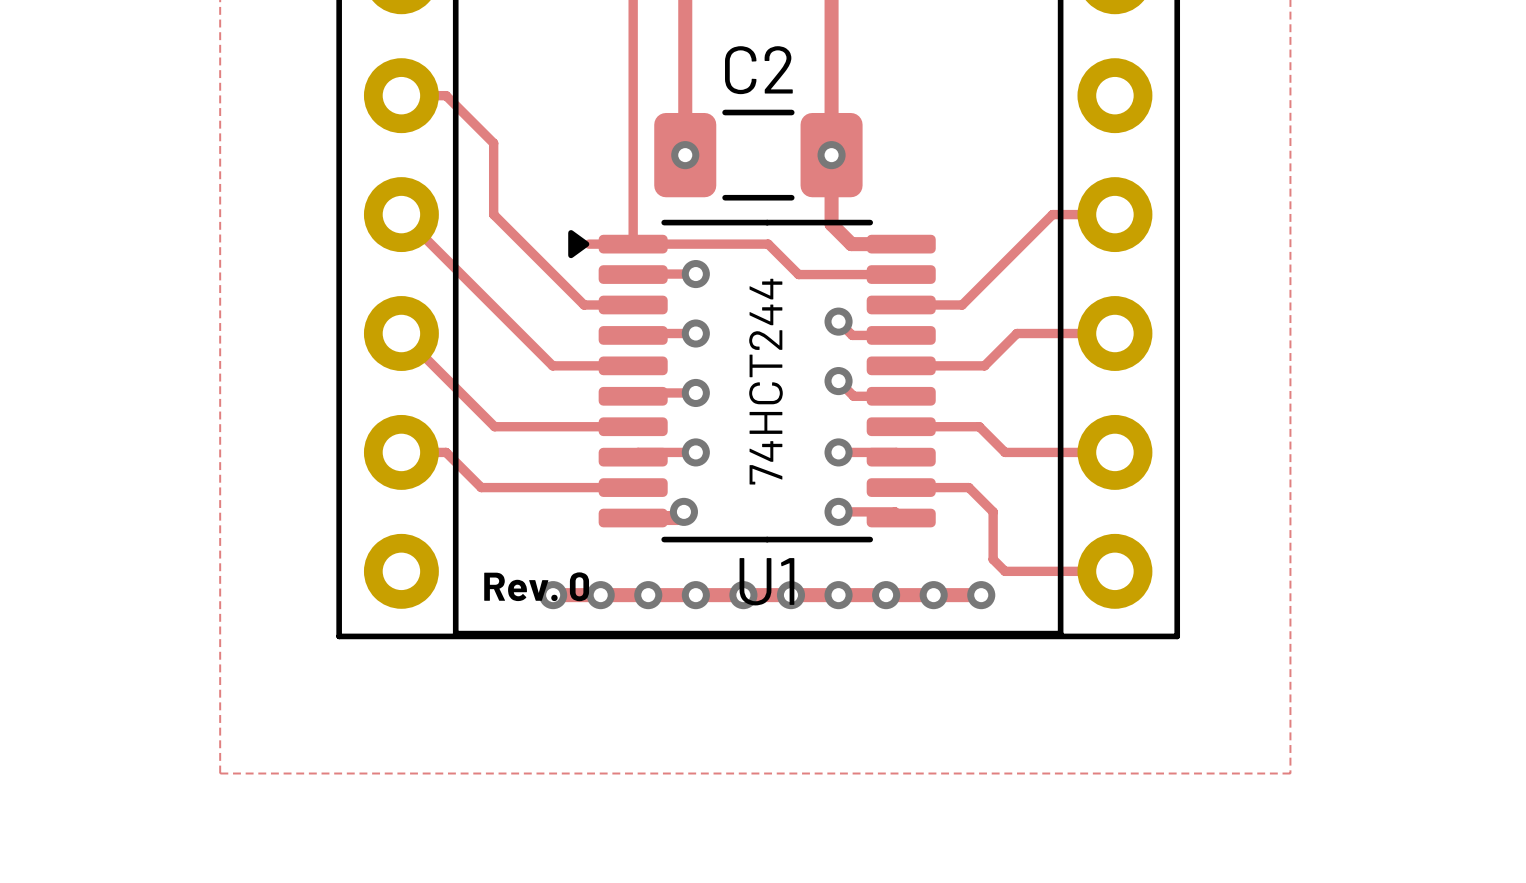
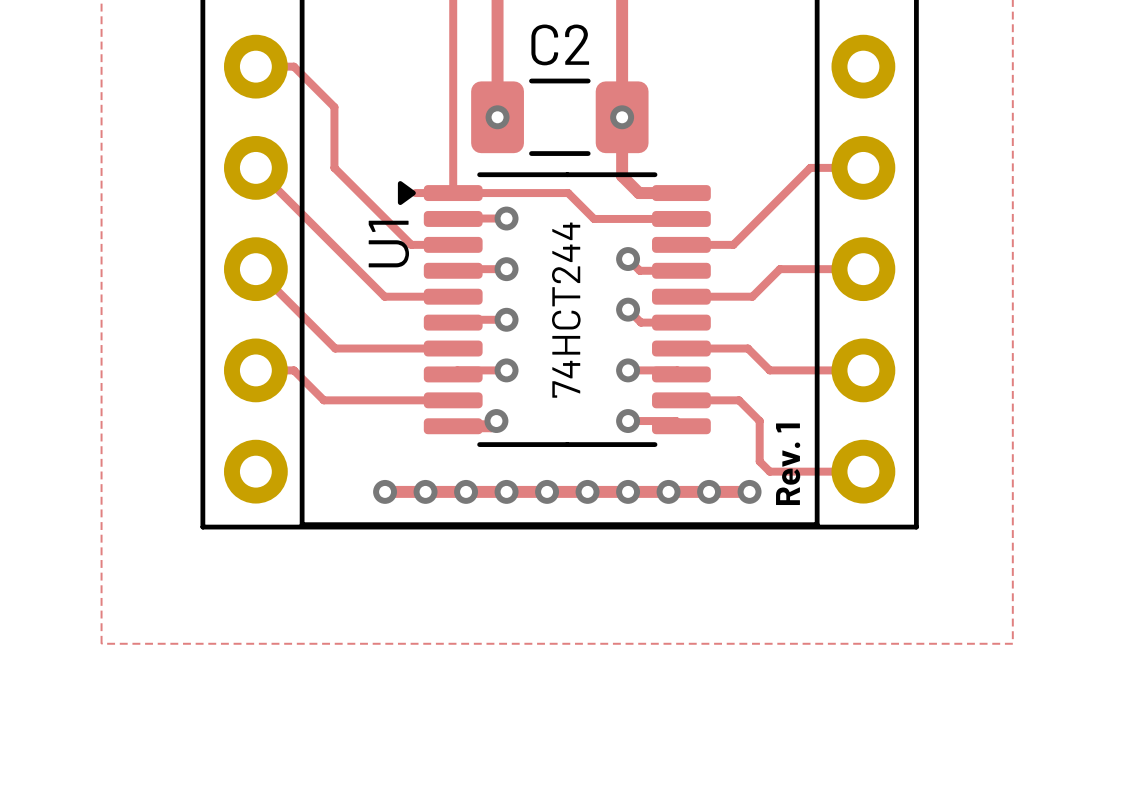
text: none -> Rev. 1 (788, 464)
U1 name rotation: 0° (766, 581) -> 90° counterclockwise (388, 244)
U1 name position: U1 (766, 581) -> U1 (388, 244)
text: Rev. 0 (536, 586) -> none

